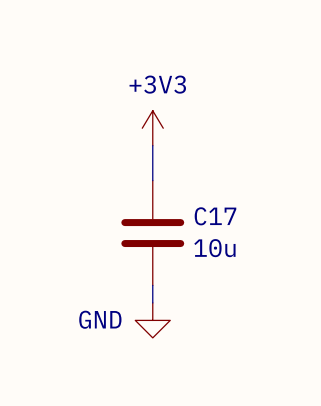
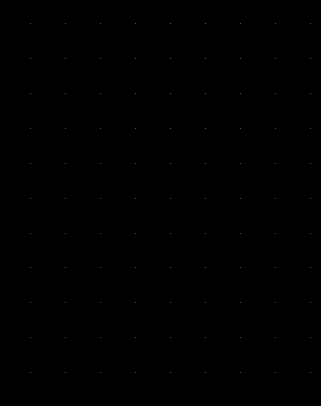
power symbol: +3V3 (152, 128) -> none
wire: (152, 145) (152, 180) -> none
C17: 10u (152, 233) -> none
wire: (152, 285) (152, 302) -> none
power symbol: GND (152, 320) -> none

